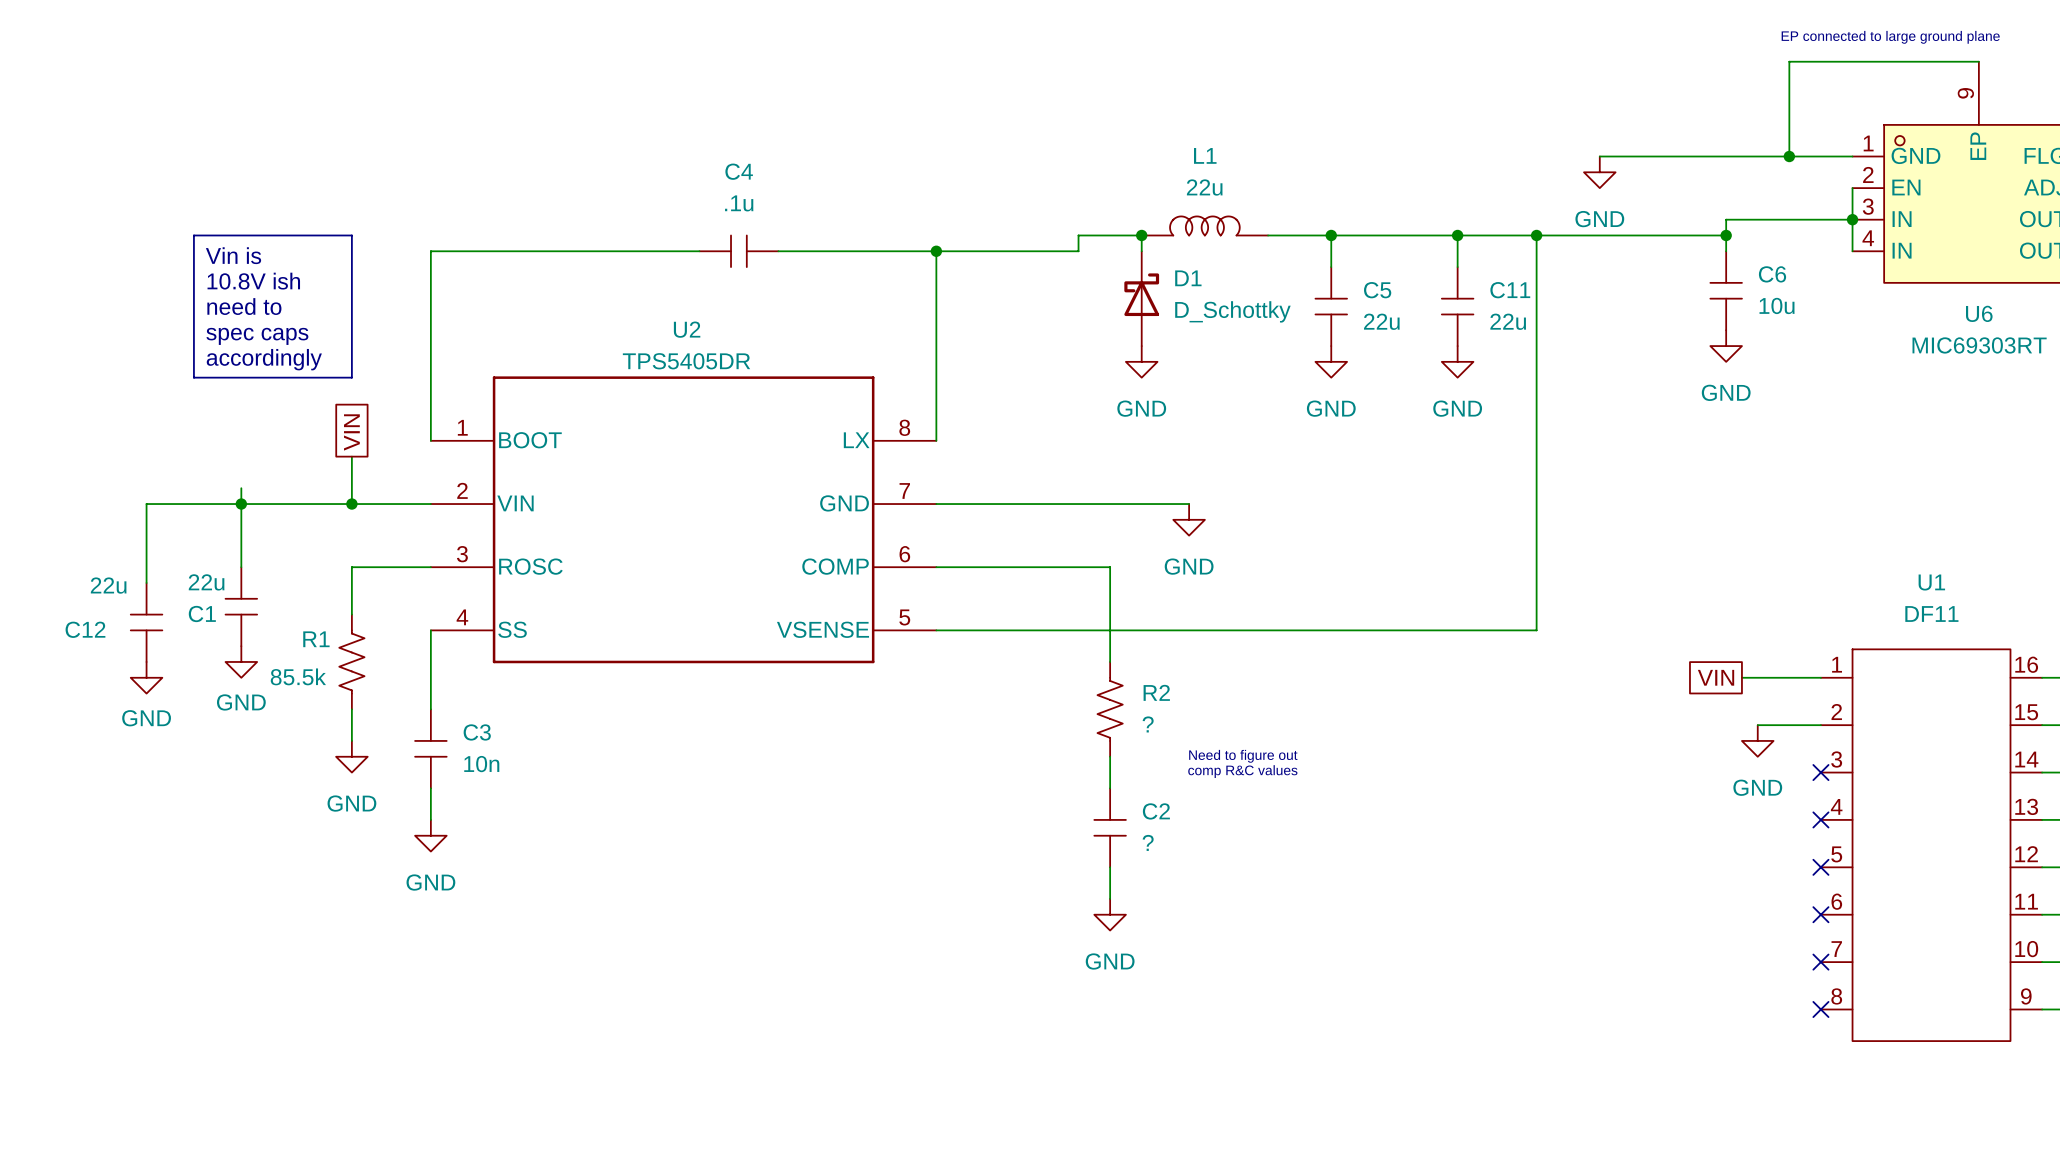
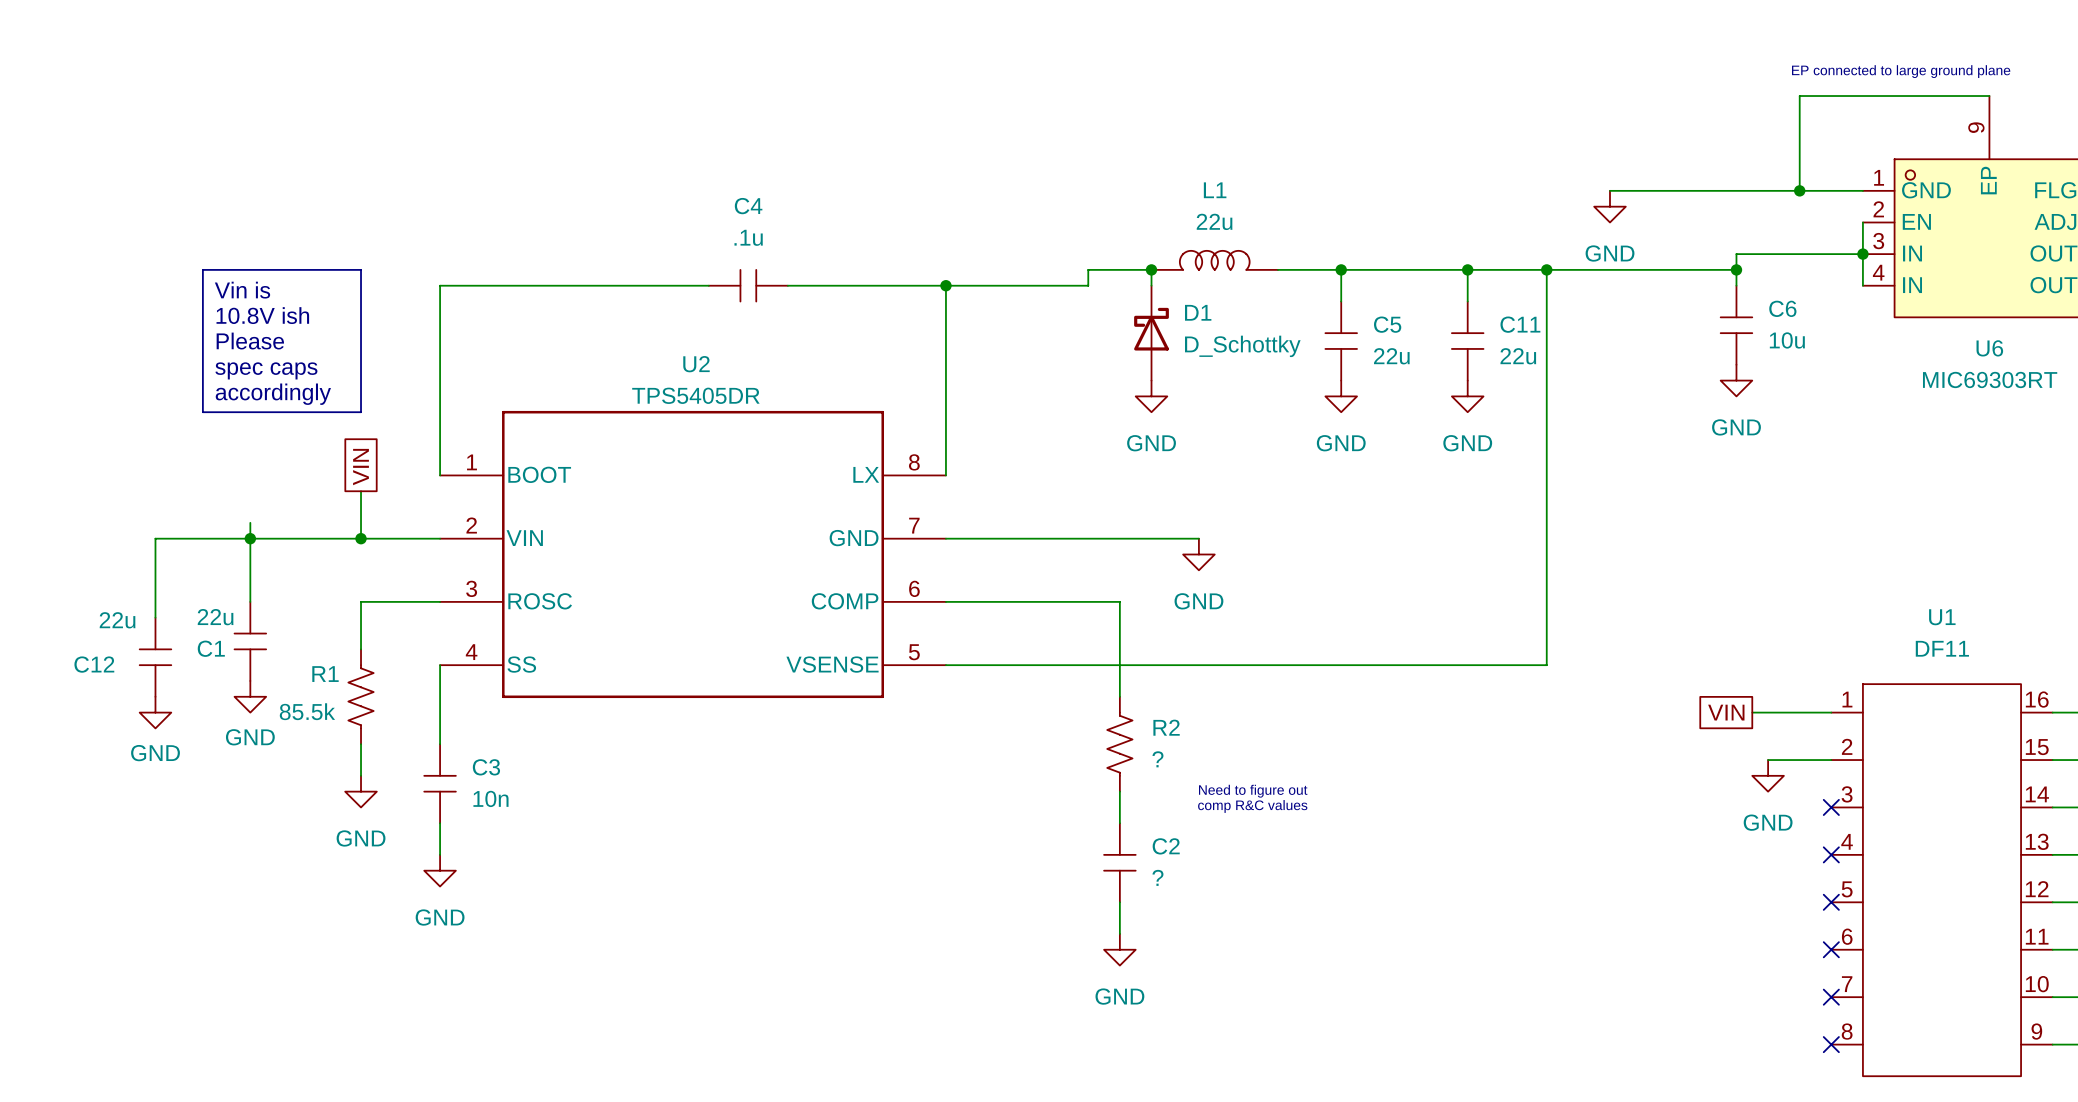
text: need to (244, 306) -> Please (250, 341)

